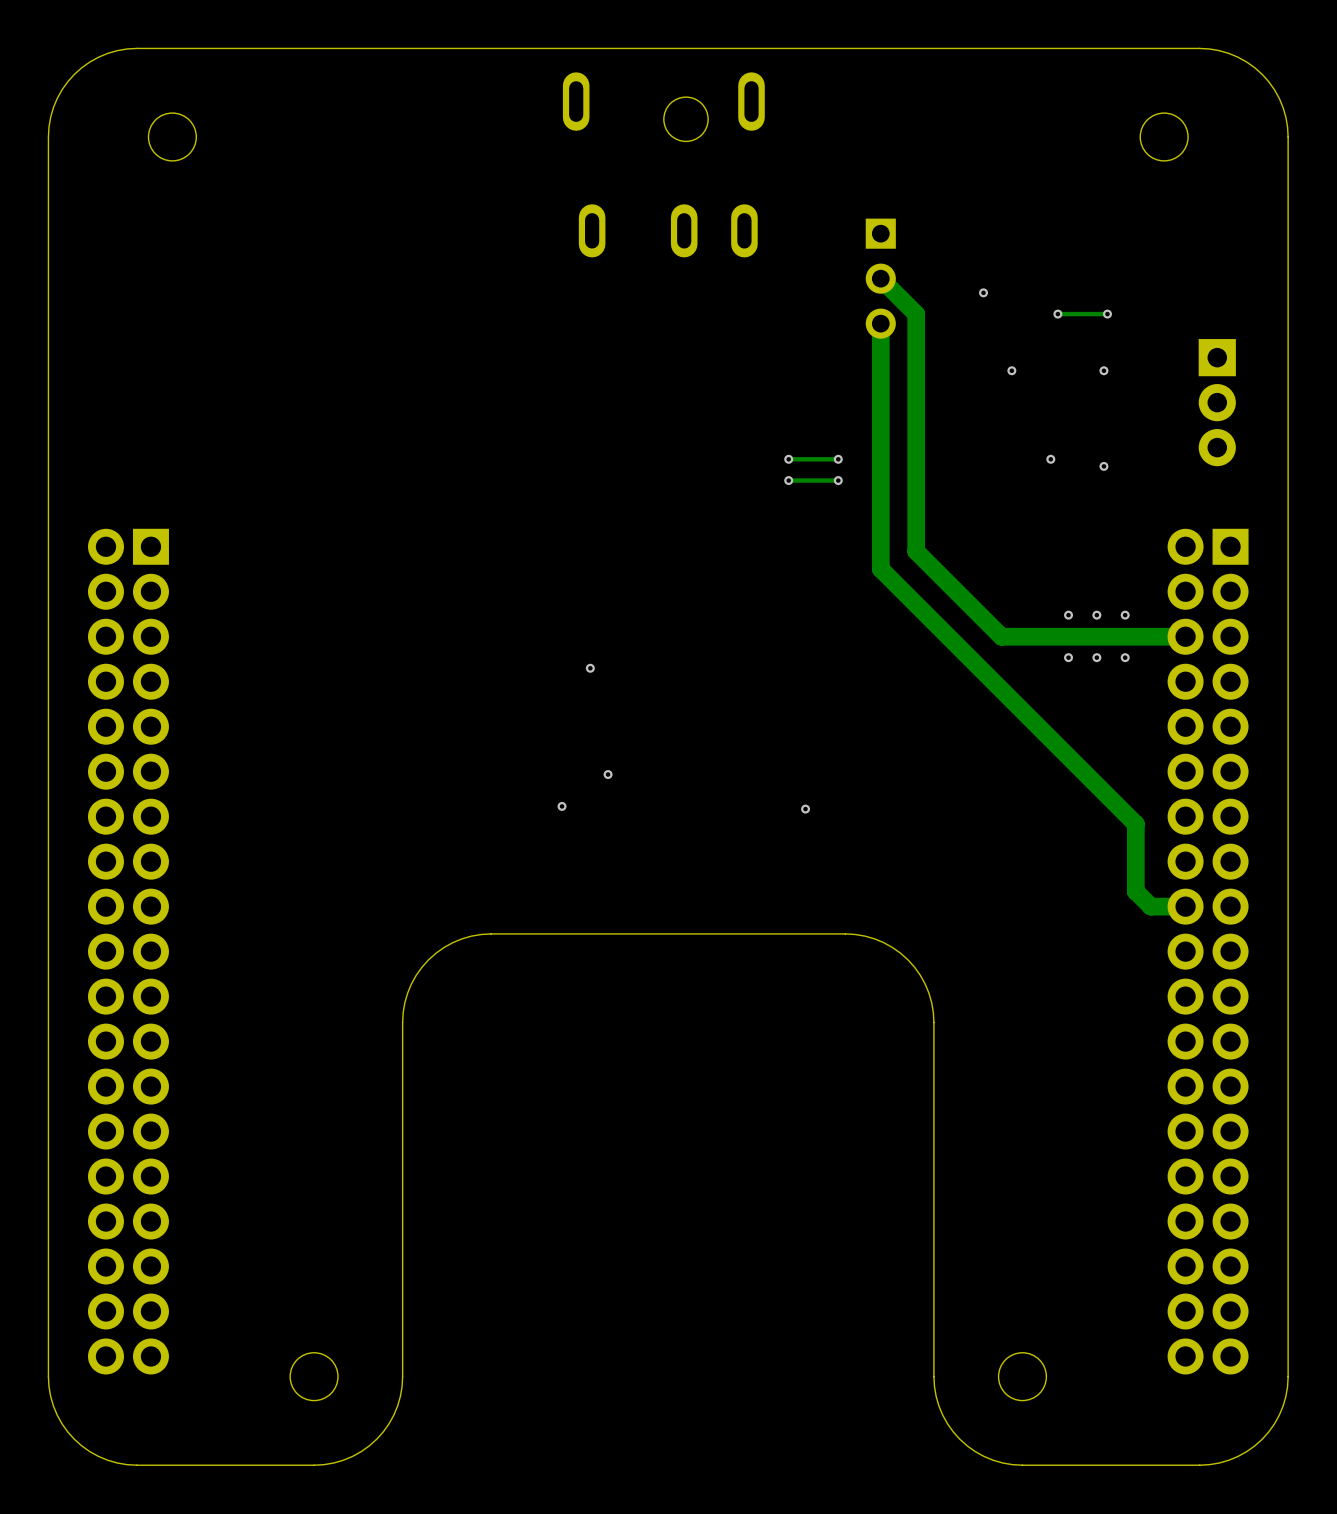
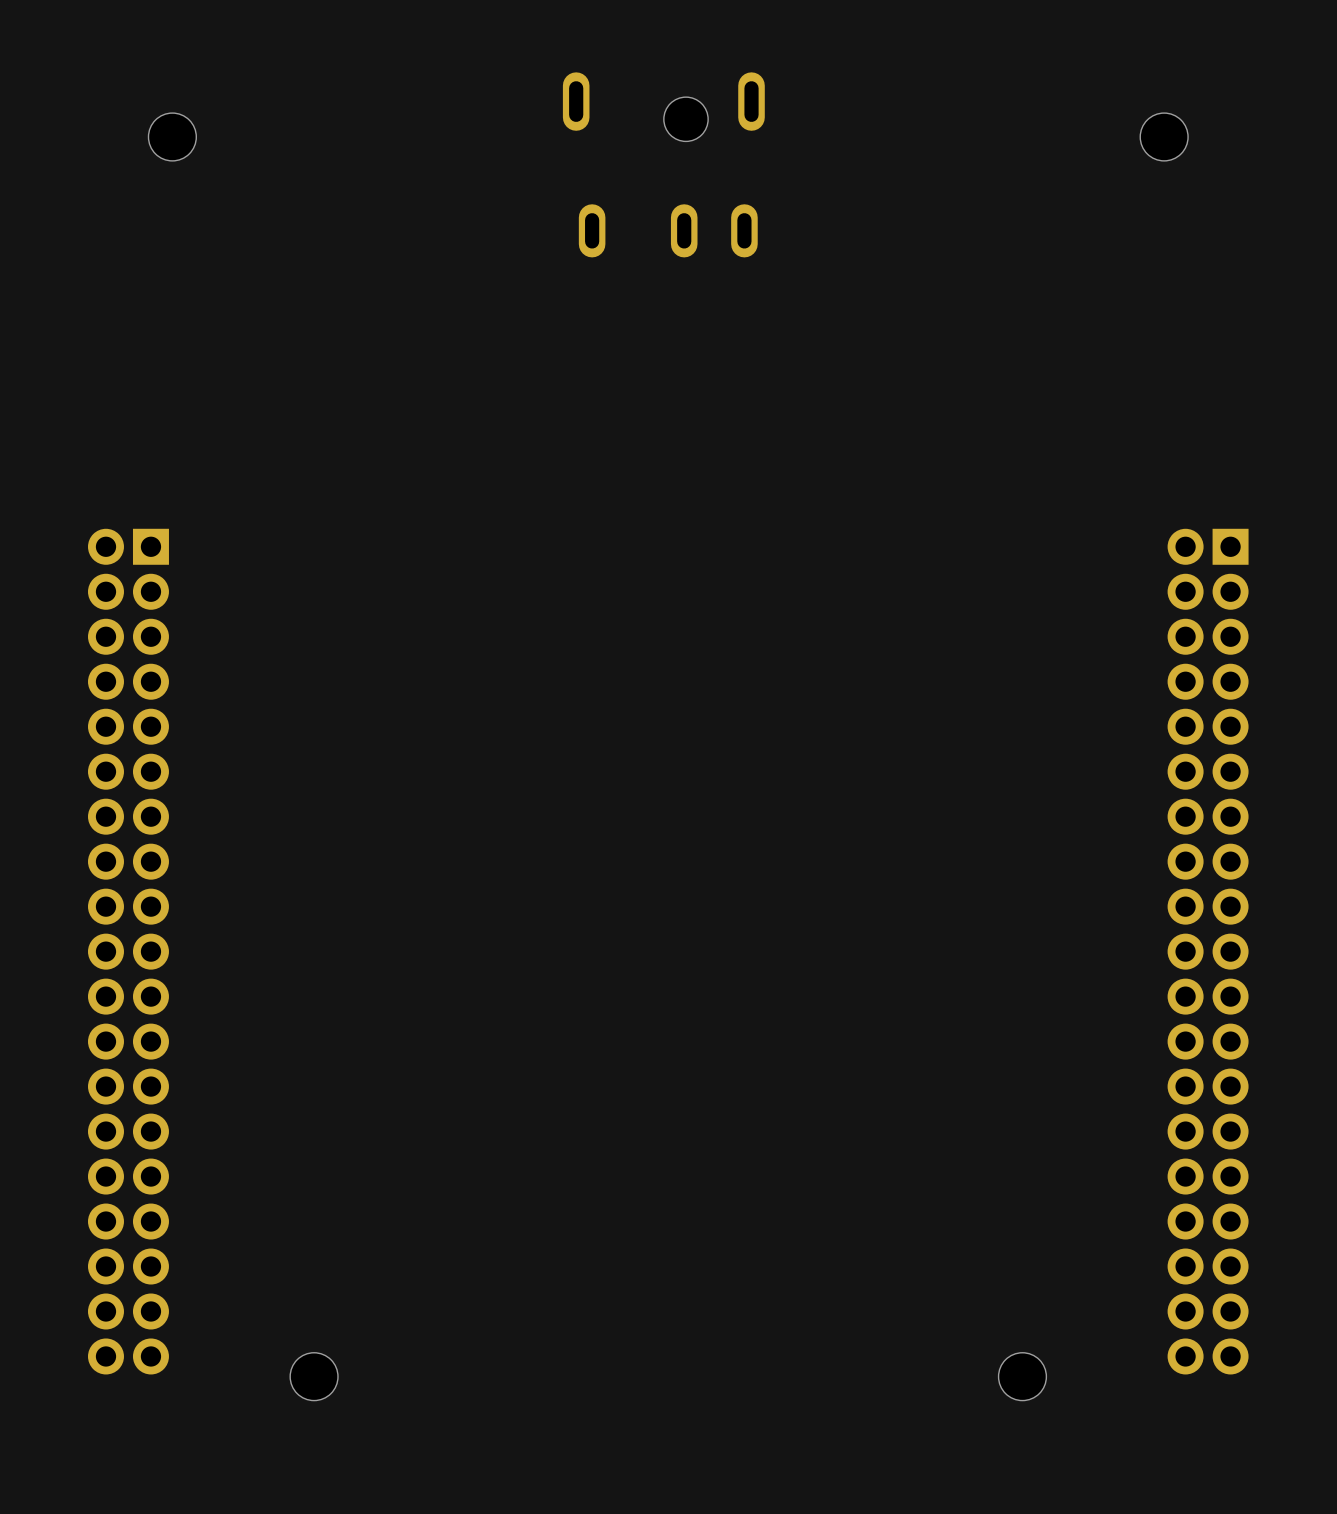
board edge: (1199, 48) (136, 48) (117, 50) (98, 57) (81, 67) (67, 81) (53, 107) (48, 136) (48, 1376) (50, 1396) (57, 1415) (67, 1431) (81, 1445) (107, 1460) (127, 1464) (314, 1465) (333, 1463) (352, 1456) (369, 1445) (383, 1431) (397, 1405) (402, 1376) (402, 1022) (404, 1002) (416, 975) (435, 953) (461, 938) (491, 933) (845, 933) (874, 938) (892, 947) (907, 959) (920, 975) (928, 993) (933, 1012) (933, 1376) (938, 1405) (953, 1431) (967, 1445) (984, 1456) (1002, 1463) (1022, 1465) (1209, 1464) (1237, 1456) (1254, 1445) (1268, 1431) (1283, 1405) (1288, 1376) (1288, 136) (1283, 107) (1274, 89) (1262, 74) (1246, 62) (1228, 53) (1199, 48) -> none
track: (880, 278) (916, 314) (916, 551) (1001, 636) (1185, 636) -> none
part: (880, 278) -> none
via: (983, 292) -> none
via: (1057, 314) -> none
track: (1107, 314) (1057, 314) -> none
via: (1107, 314) -> none
track: (880, 323) (880, 569) (1135, 824) (1135, 891) (1151, 906) (1185, 906) -> none
via: (1011, 370) -> none
via: (1103, 370) -> none
part: (1217, 402) -> none
via: (788, 459) -> none
track: (838, 459) (788, 459) -> none
via: (838, 459) -> none
via: (1050, 459) -> none
via: (1103, 466) -> none
via: (788, 480) -> none
track: (838, 480) (788, 480) -> none
via: (838, 480) -> none
via: (1068, 615) -> none
via: (1096, 615) -> none
via: (1125, 615) -> none
via: (1068, 657) -> none
via: (1096, 657) -> none
via: (1125, 657) -> none
via: (590, 668) -> none
via: (608, 774) -> none
via: (562, 806) -> none
via: (805, 809) -> none

